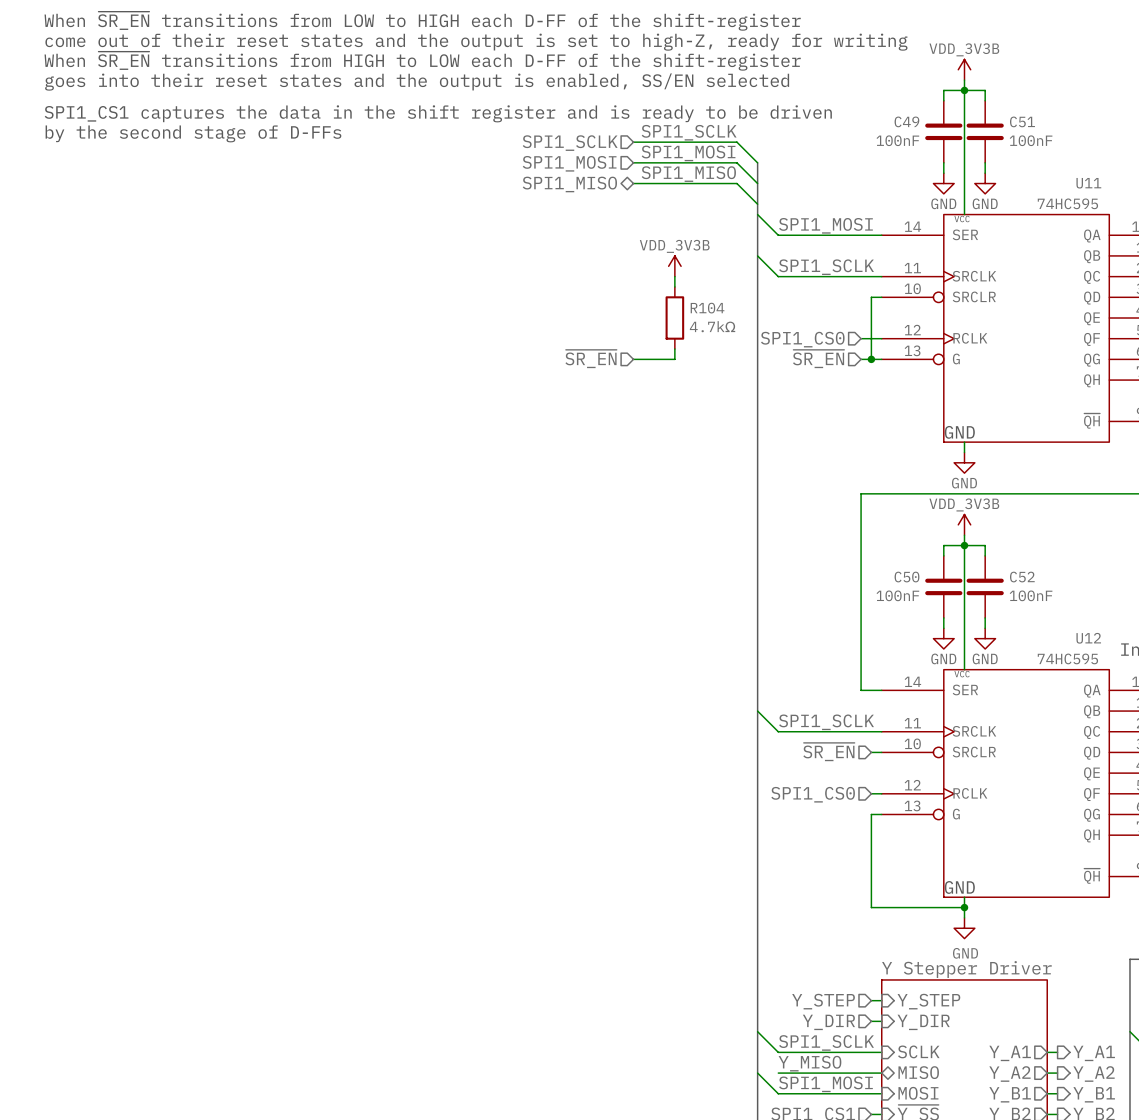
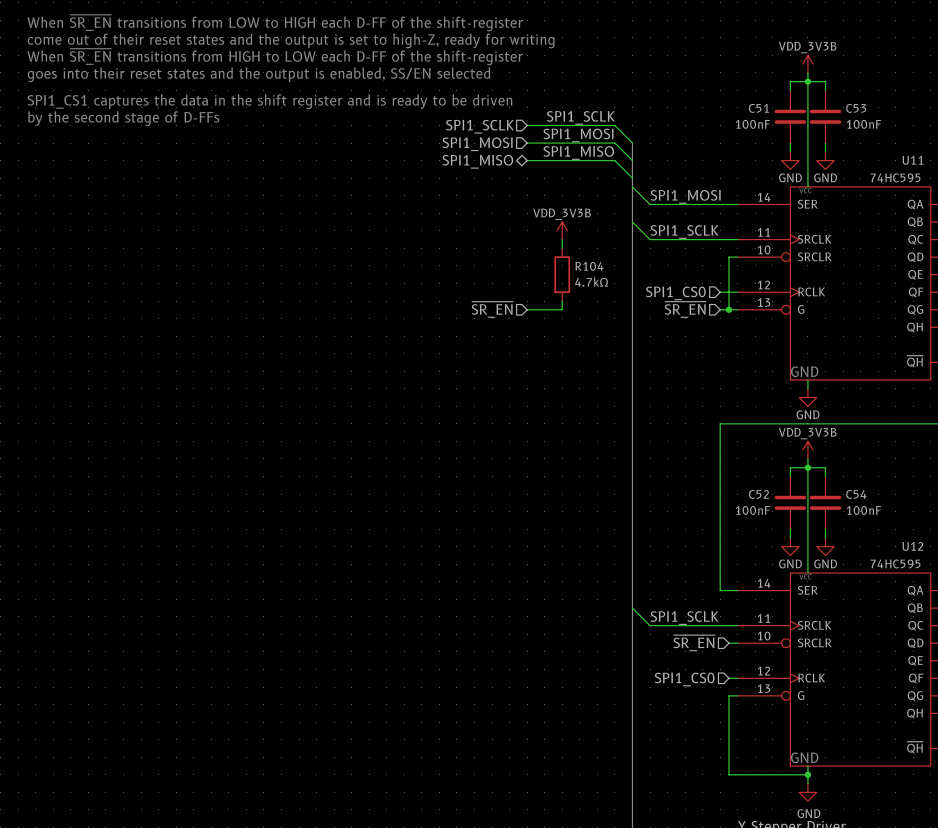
C49 name: C49 (906, 121) -> C51 (758, 108)
C51 name: C51 (1022, 121) -> C53 (856, 108)
C50 name: C50 (906, 577) -> C52 (758, 494)
C52 name: C52 (1022, 577) -> C54 (856, 494)

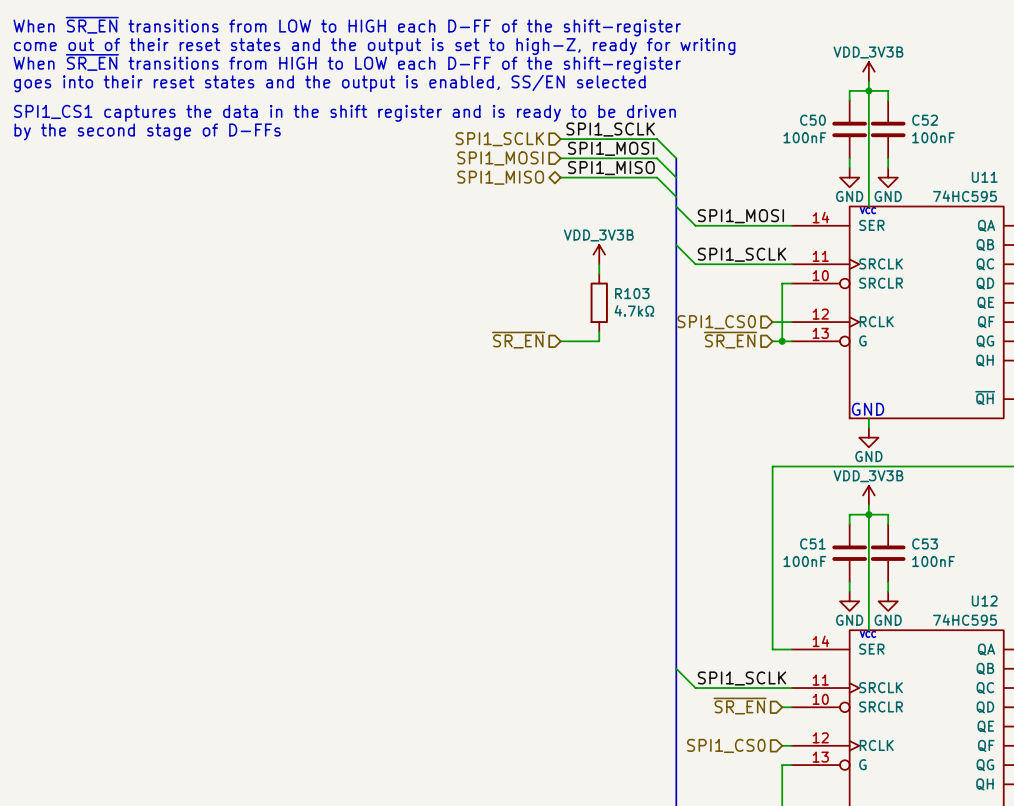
C51 name: C51 (758, 108) -> C50 (812, 120)
C53 name: C53 (856, 108) -> C52 (925, 120)
R104 name: R104 (589, 266) -> R103 (632, 293)
C52 name: C52 (758, 494) -> C51 (812, 543)
C54 name: C54 (856, 494) -> C53 (925, 543)

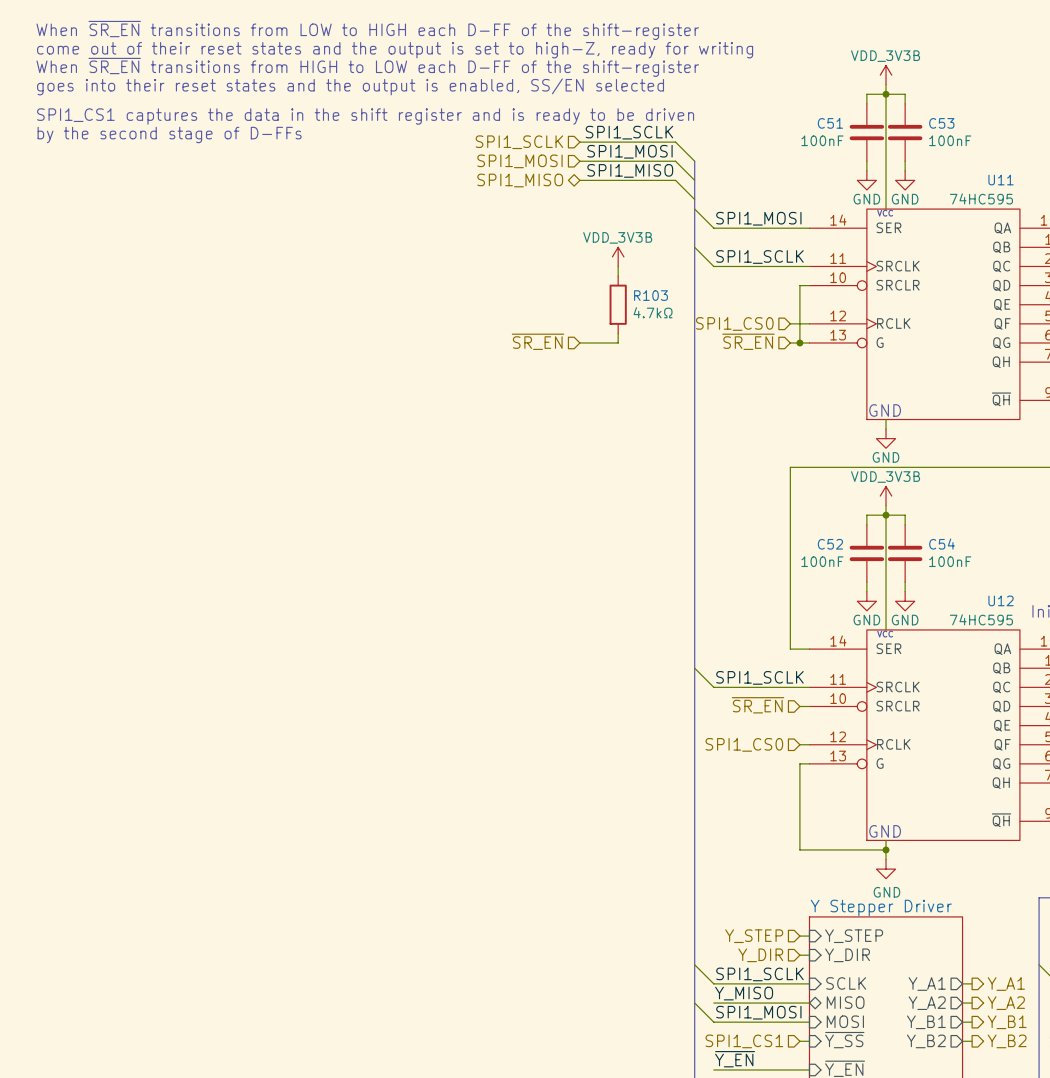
C50 name: C50 (812, 120) -> C51 (830, 123)
C52 name: C52 (925, 120) -> C53 (941, 123)
C51 name: C51 (812, 543) -> C52 (830, 544)
C53 name: C53 (925, 543) -> C54 (942, 544)

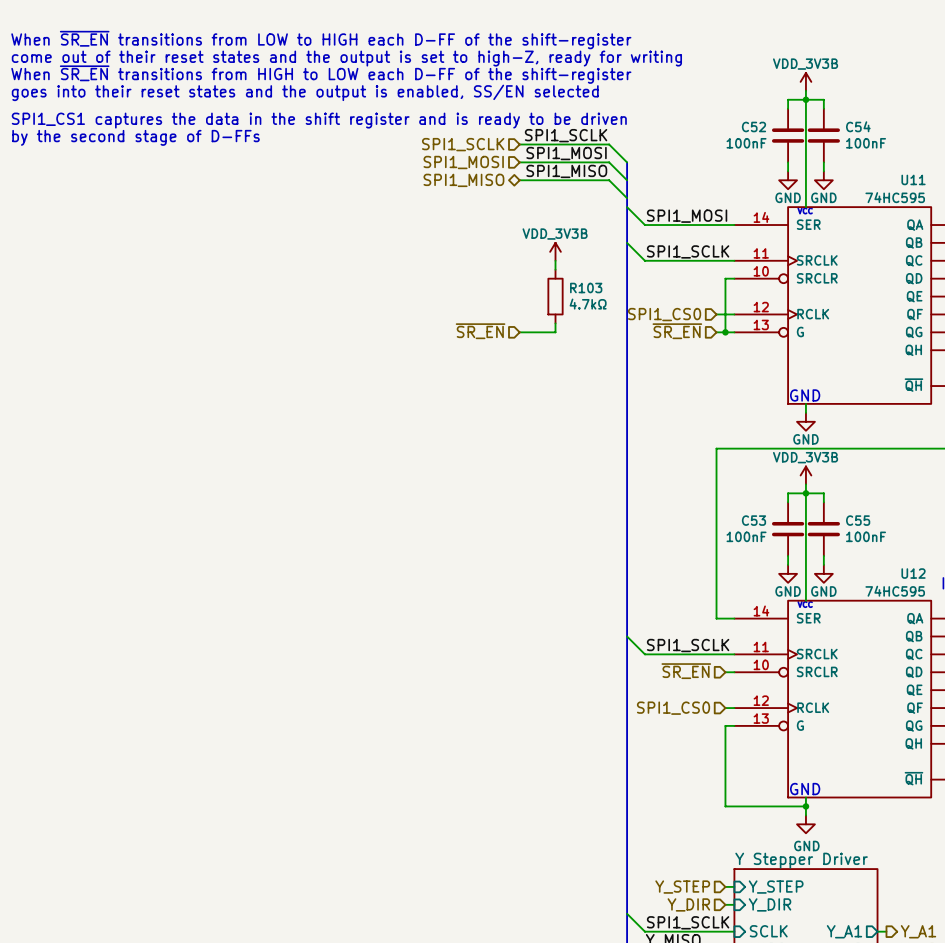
C51 name: C51 (830, 123) -> C52 (753, 126)
C53 name: C53 (941, 123) -> C54 (858, 126)
C52 name: C52 (830, 544) -> C53 (753, 520)
C54 name: C54 (942, 544) -> C55 (858, 520)

